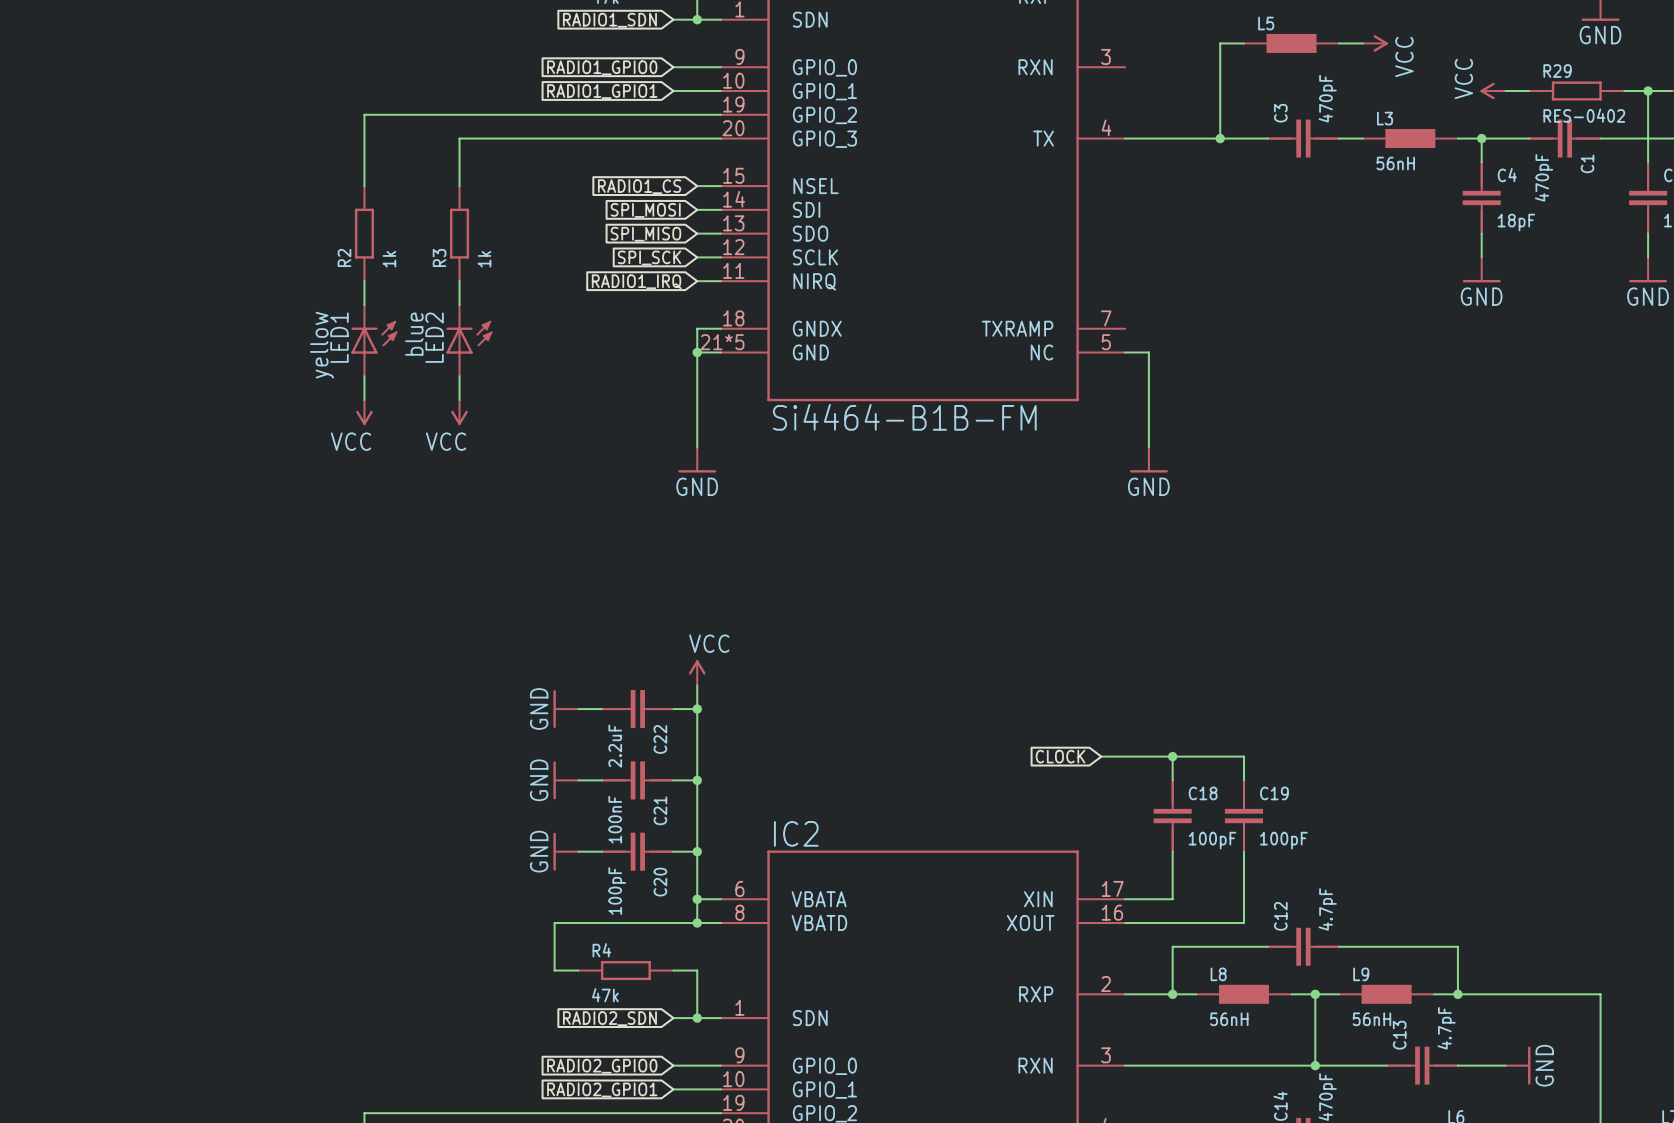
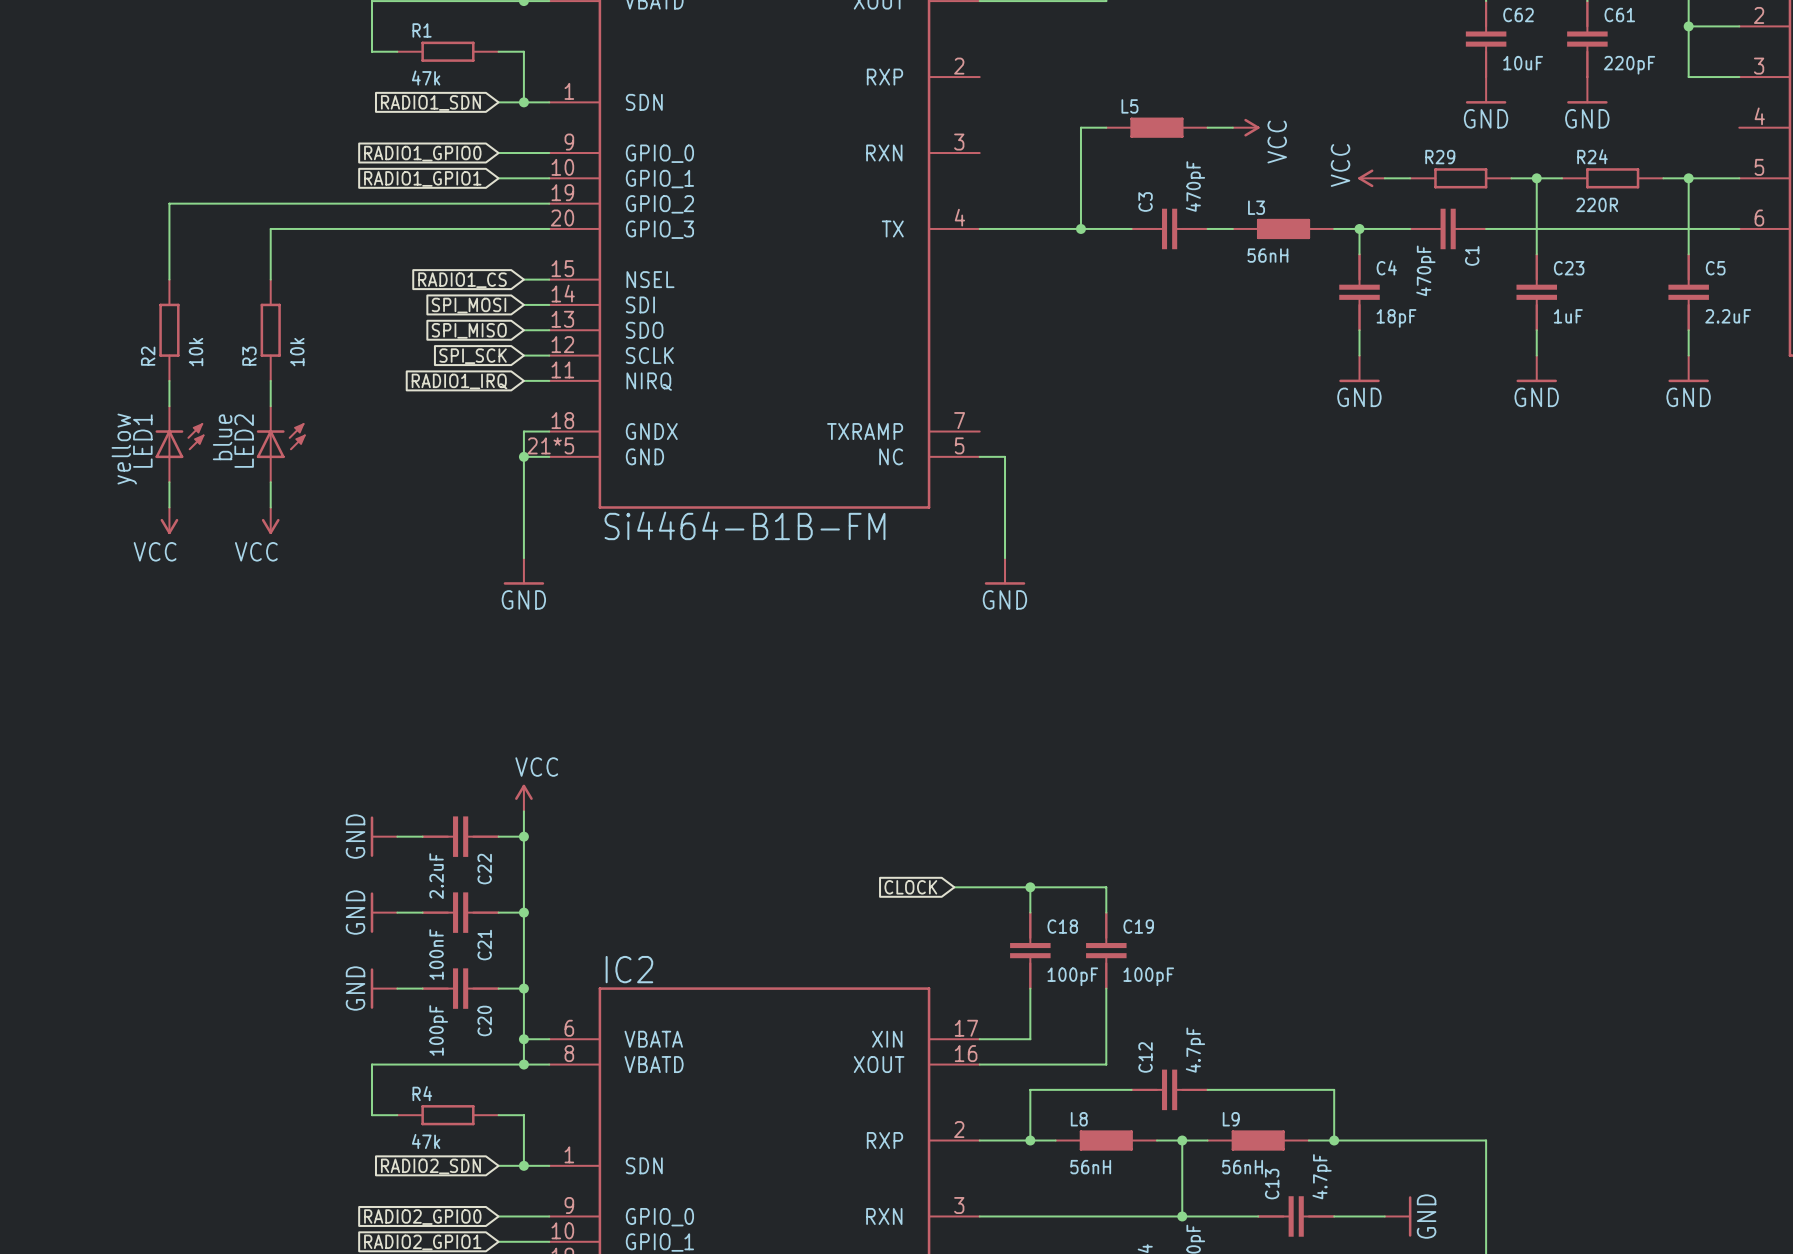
R29 value: RES-0402 (1584, 115) -> none
R2 value: 1k (389, 259) -> 10k (196, 352)
R3 value: 1k (484, 259) -> 10k (297, 352)

